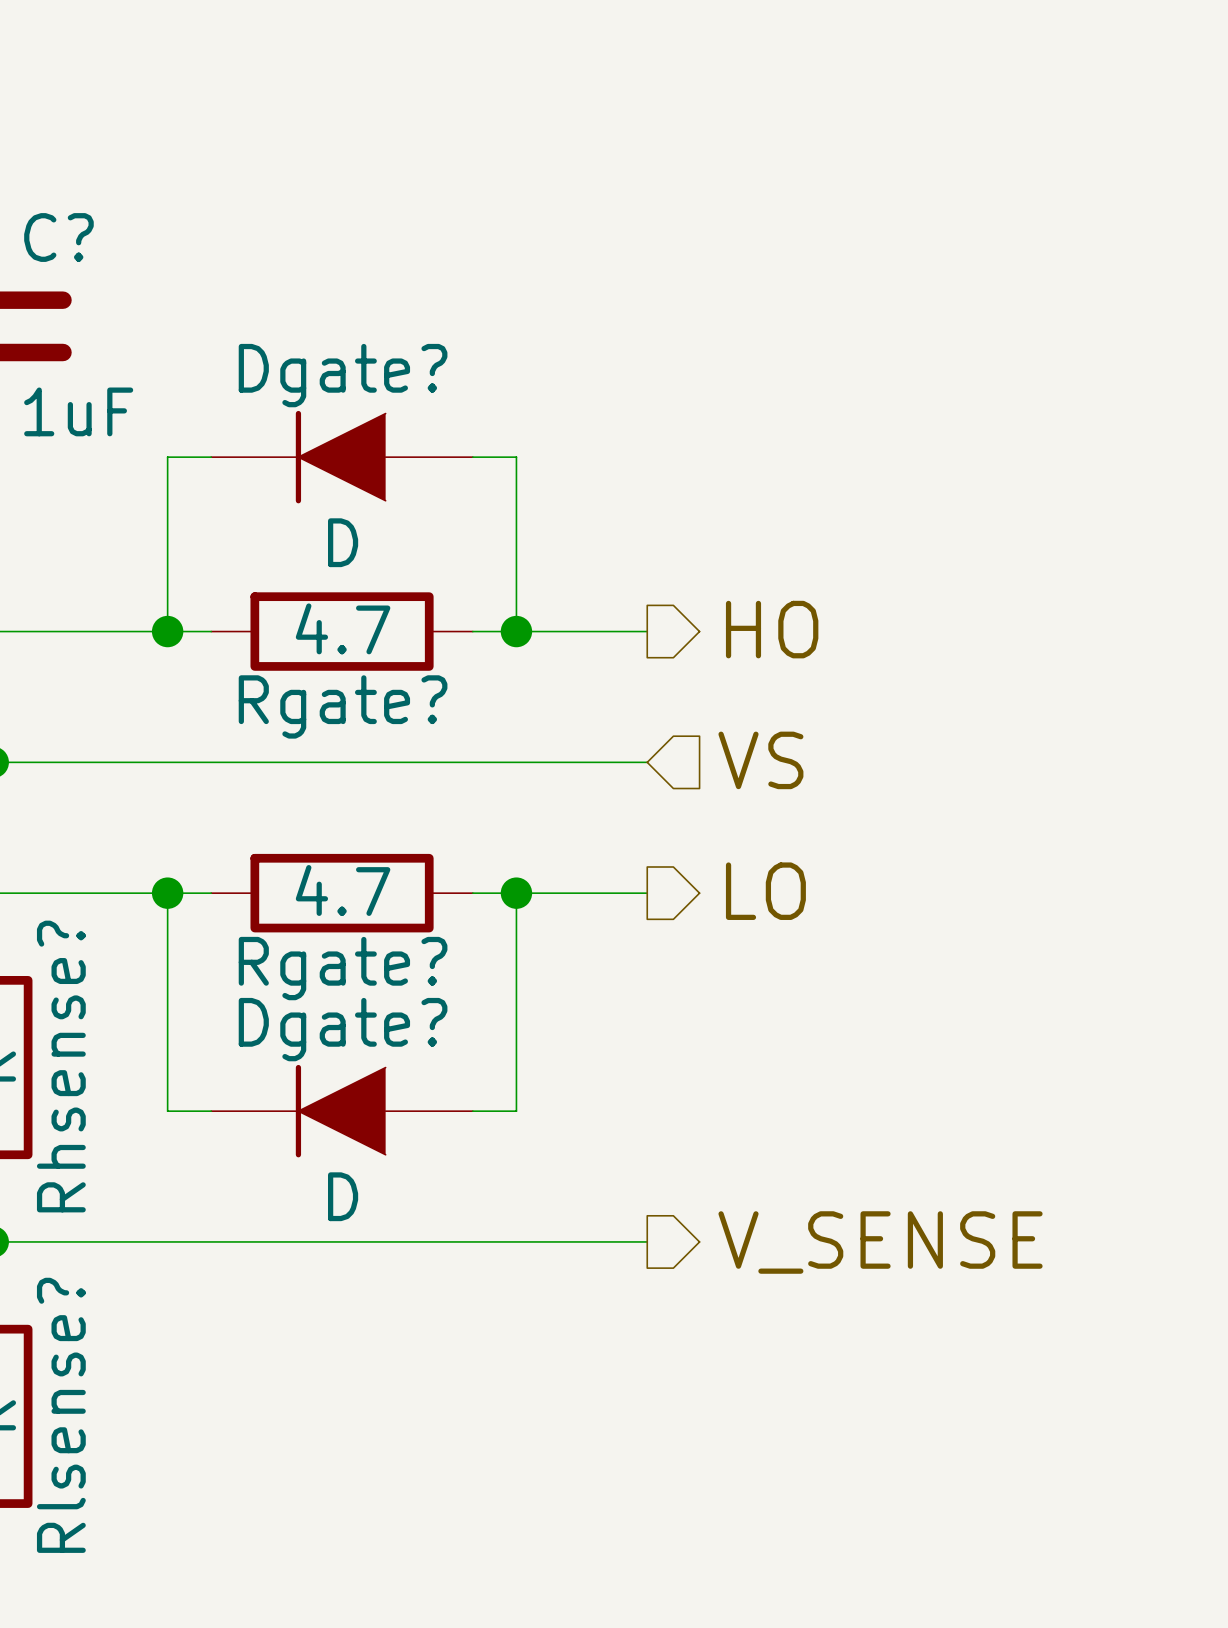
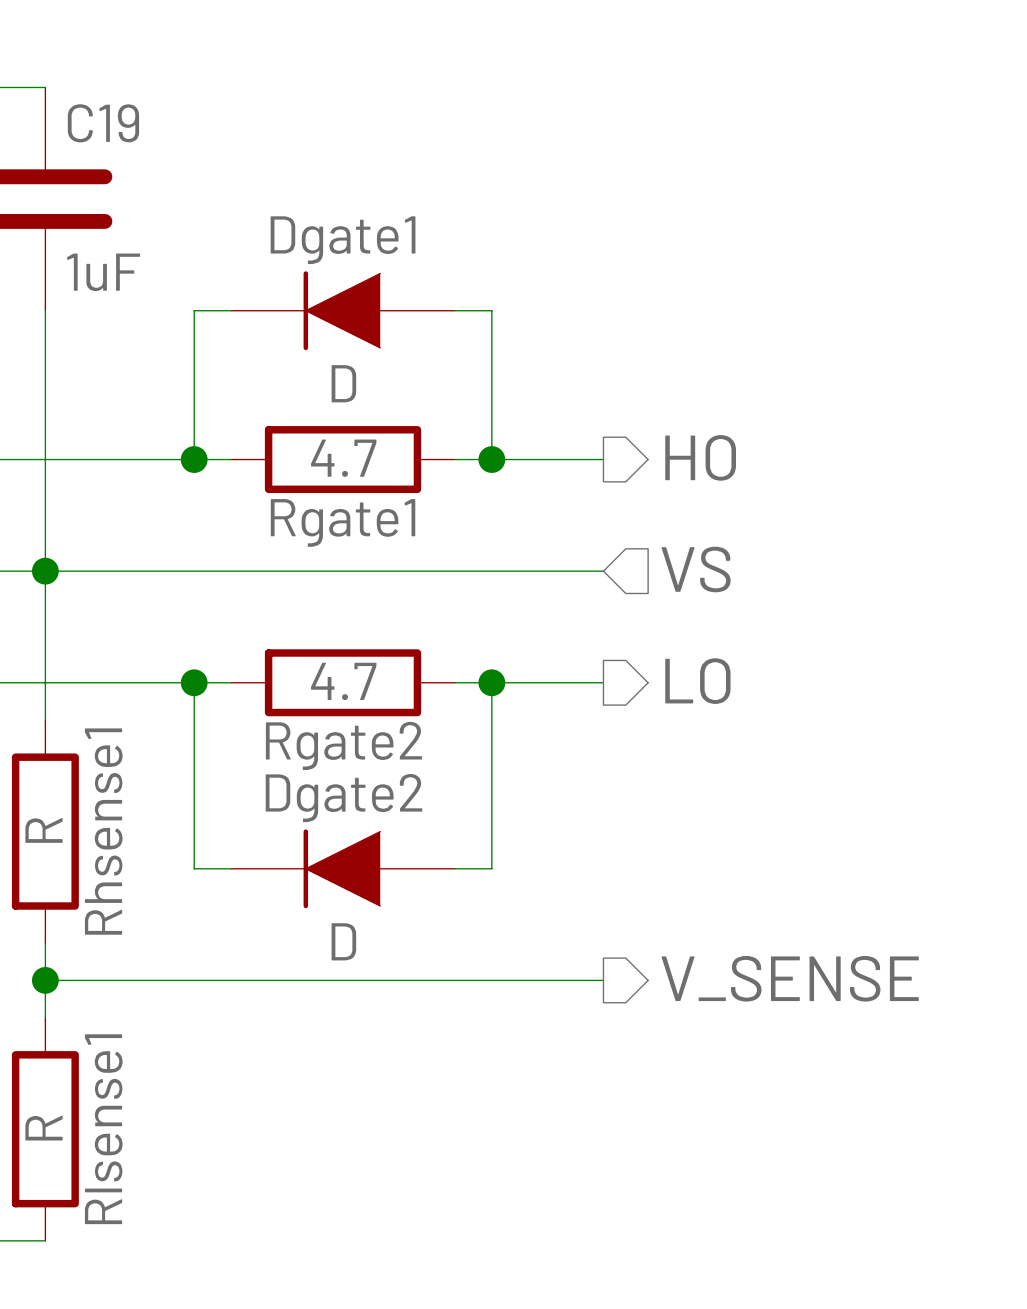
C? name: C? (58, 237) -> C19 (103, 123)
Dgate? name: Dgate? (343, 375) -> Dgate1 (343, 240)
Rgate? name: Rgate? (343, 706) -> Rgate1 (343, 522)
Rgate? name: Rgate? (343, 968) -> Rgate2 (343, 745)
Dgate? name: Dgate? (343, 1029) -> Dgate2 (343, 798)
Rhsense? name: Rhsense? (61, 1066) -> Rhsense1 (103, 831)
Rlsense? name: Rlsense? (61, 1415) -> Rlsense1 (103, 1129)

